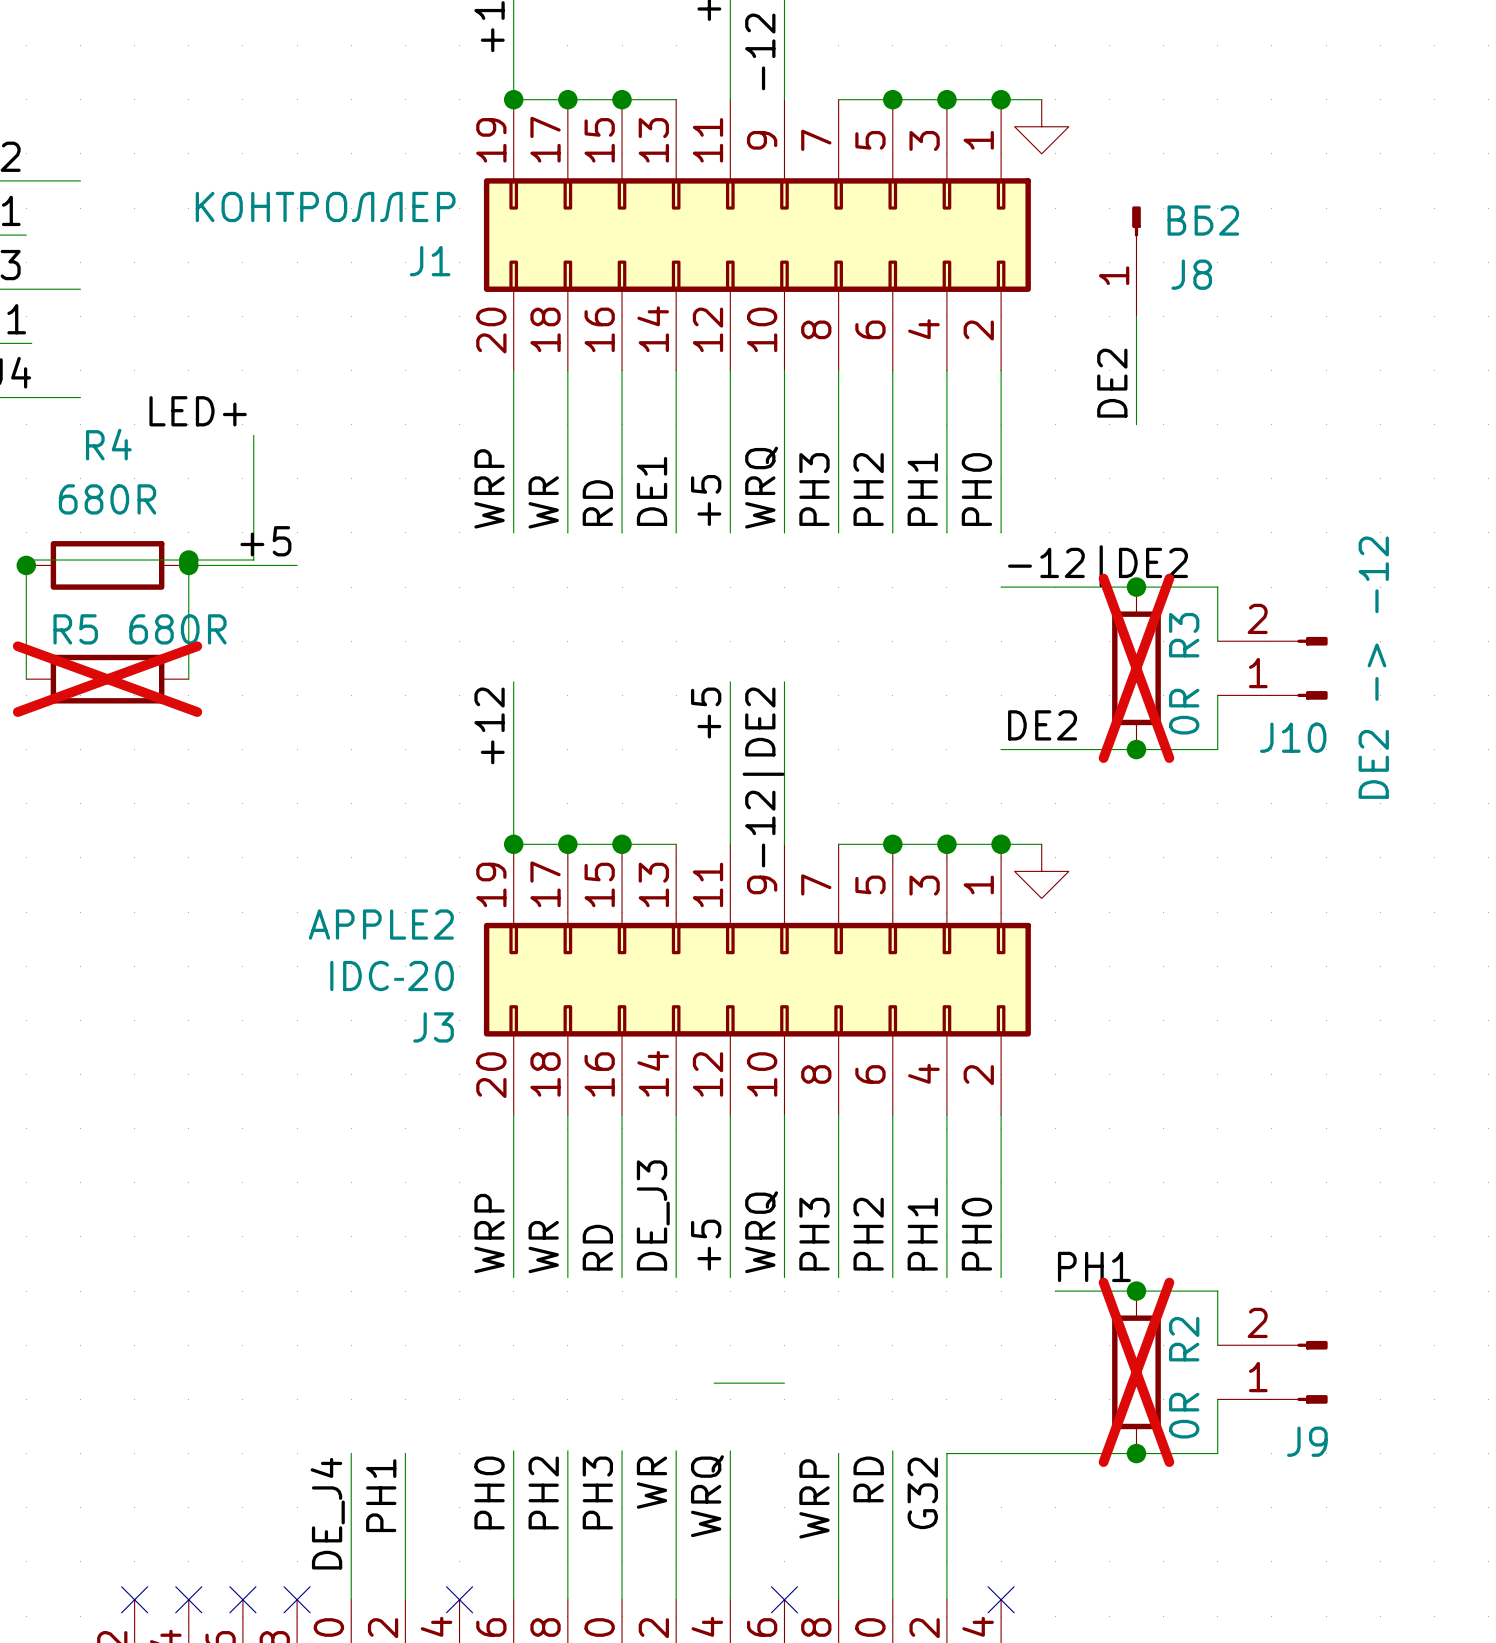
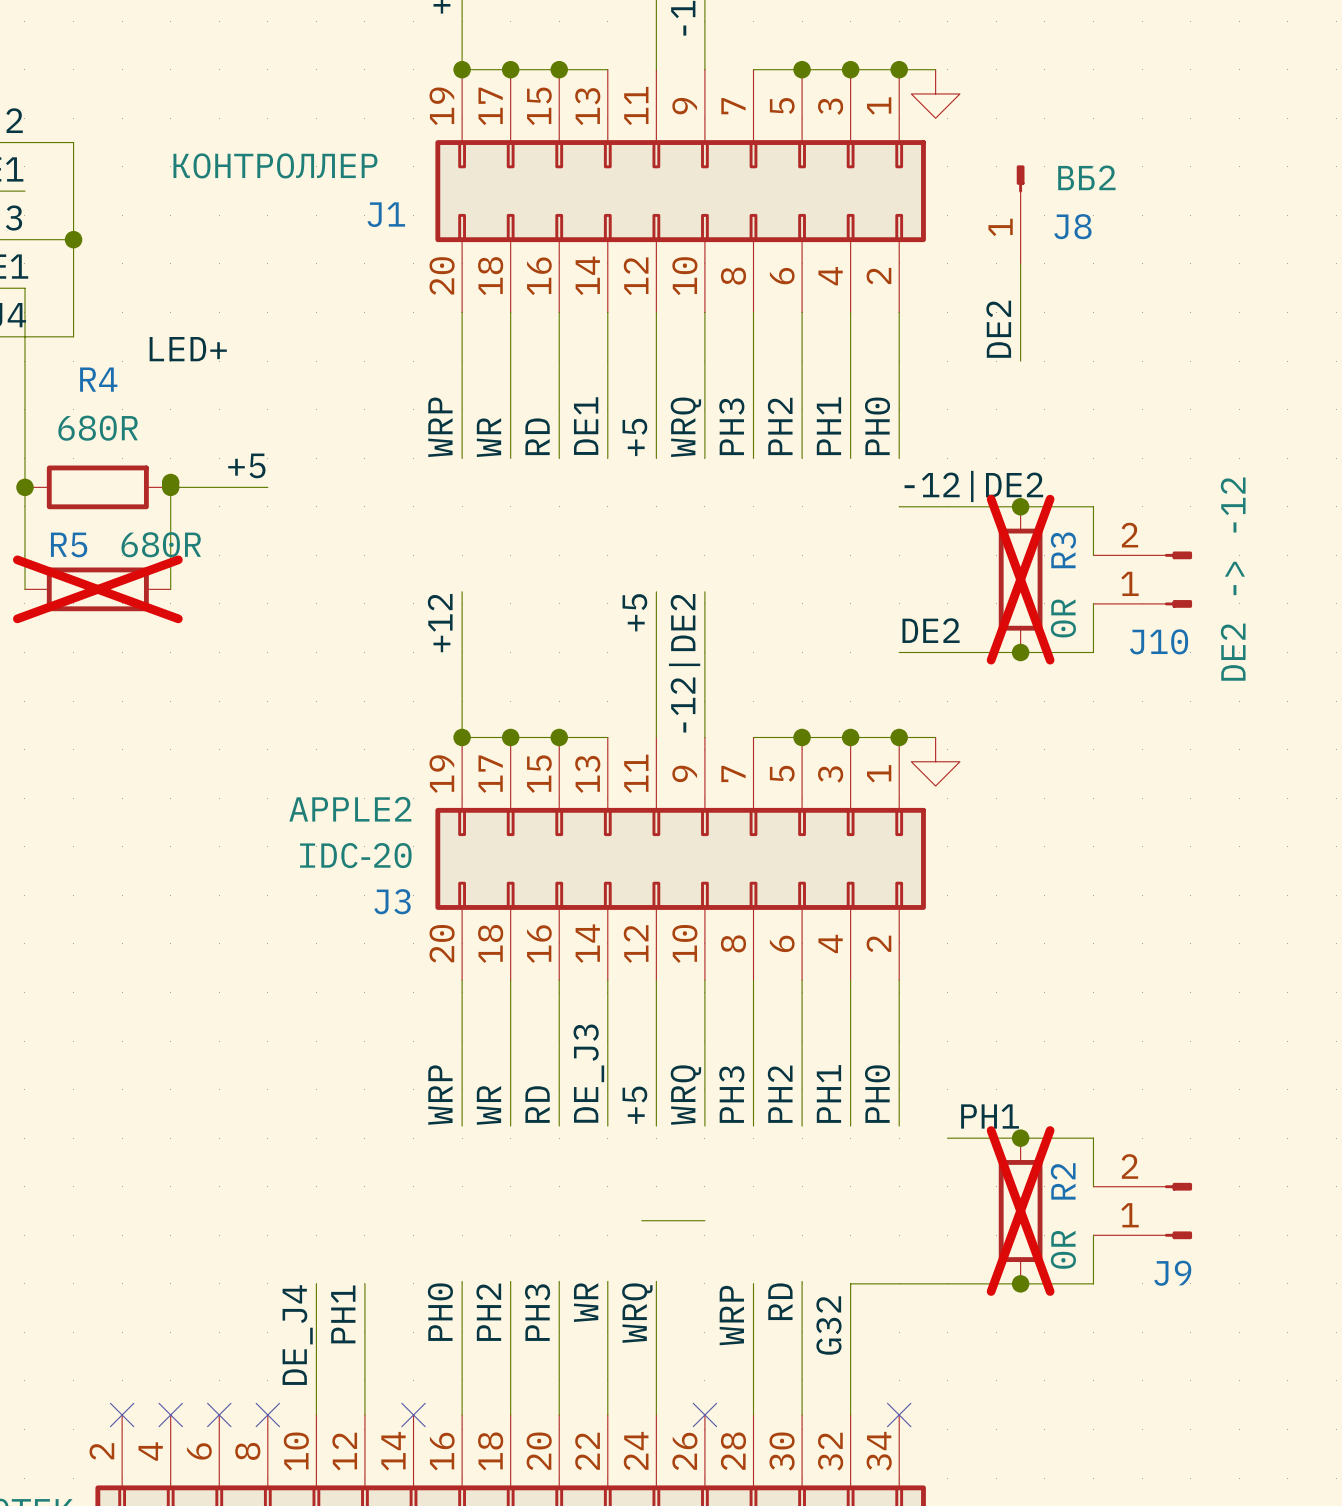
wire: none -> (73, 142) (73, 336)
junction: none -> (73, 239)
wire: (26, 343) (31, 343) -> (24, 288) (24, 482)
wire: (253, 435) (253, 560) (26, 560) -> none

